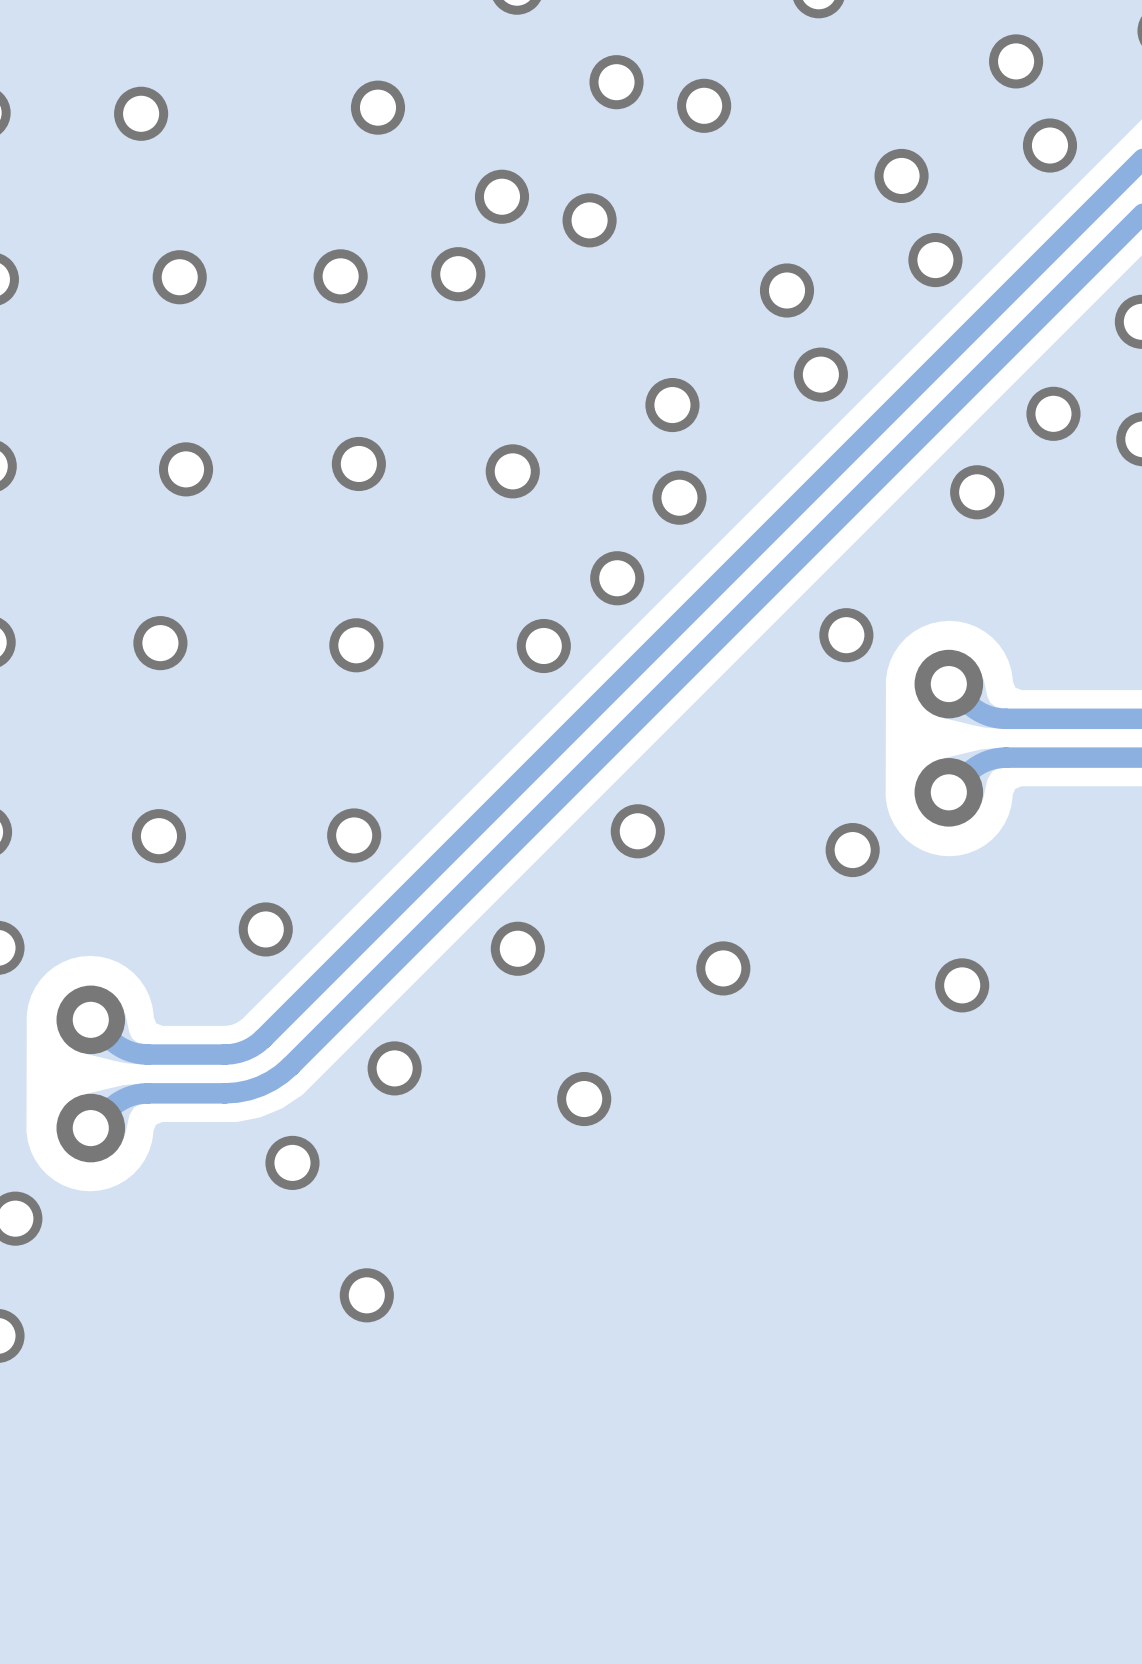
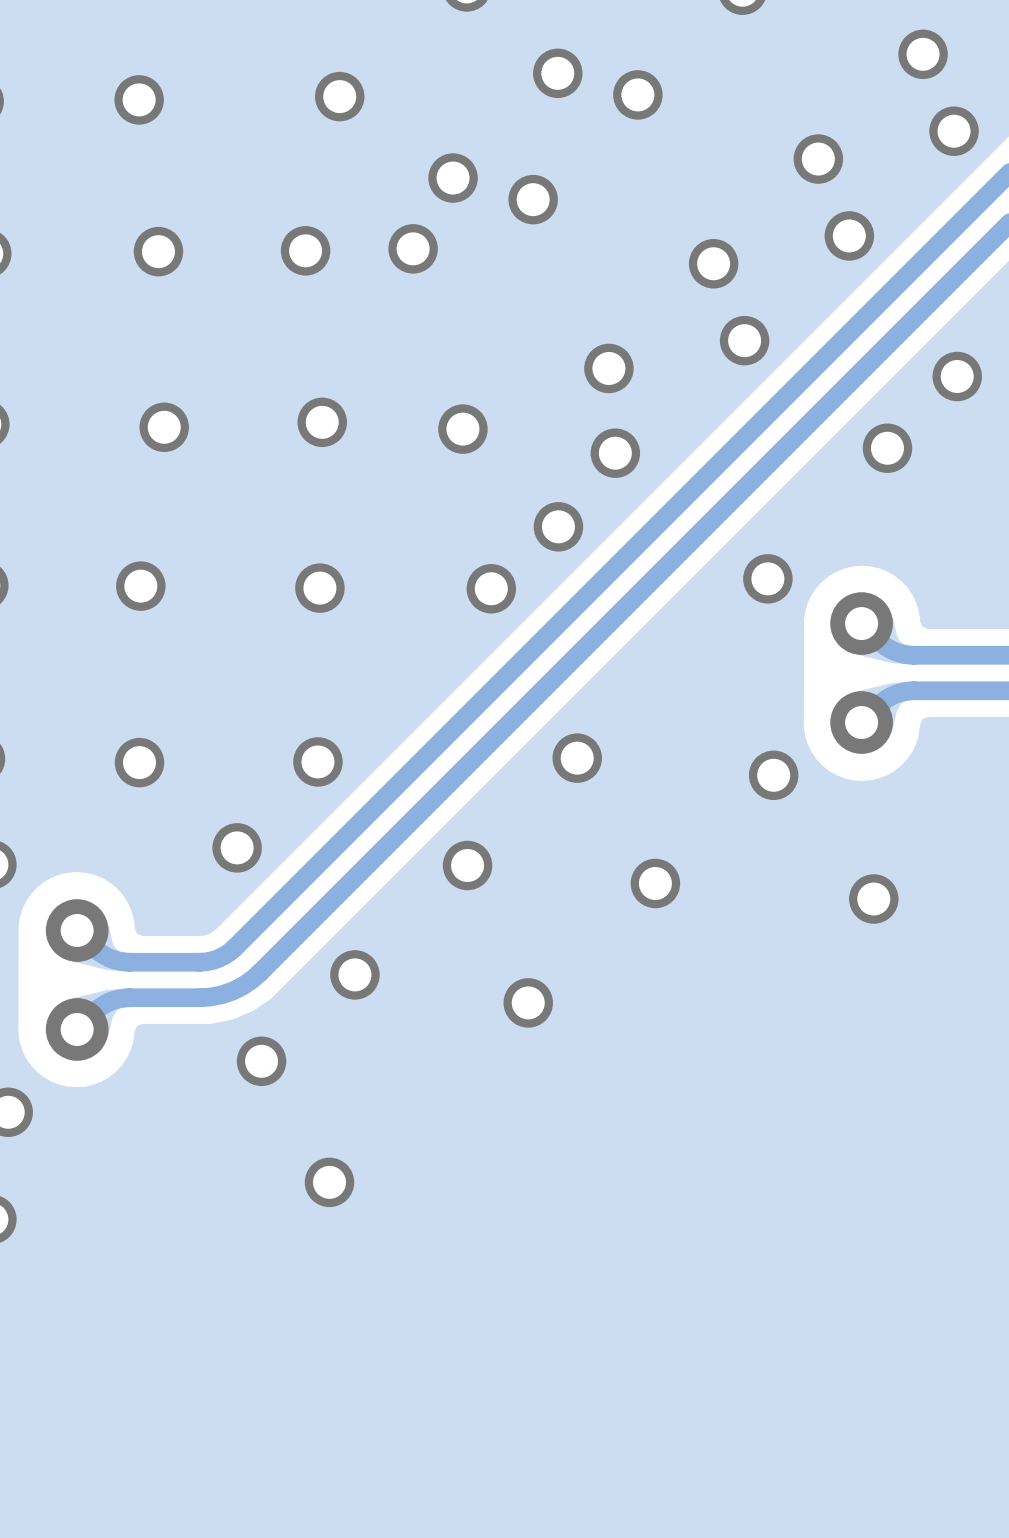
via position: (141, 113) -> (139, 99)

